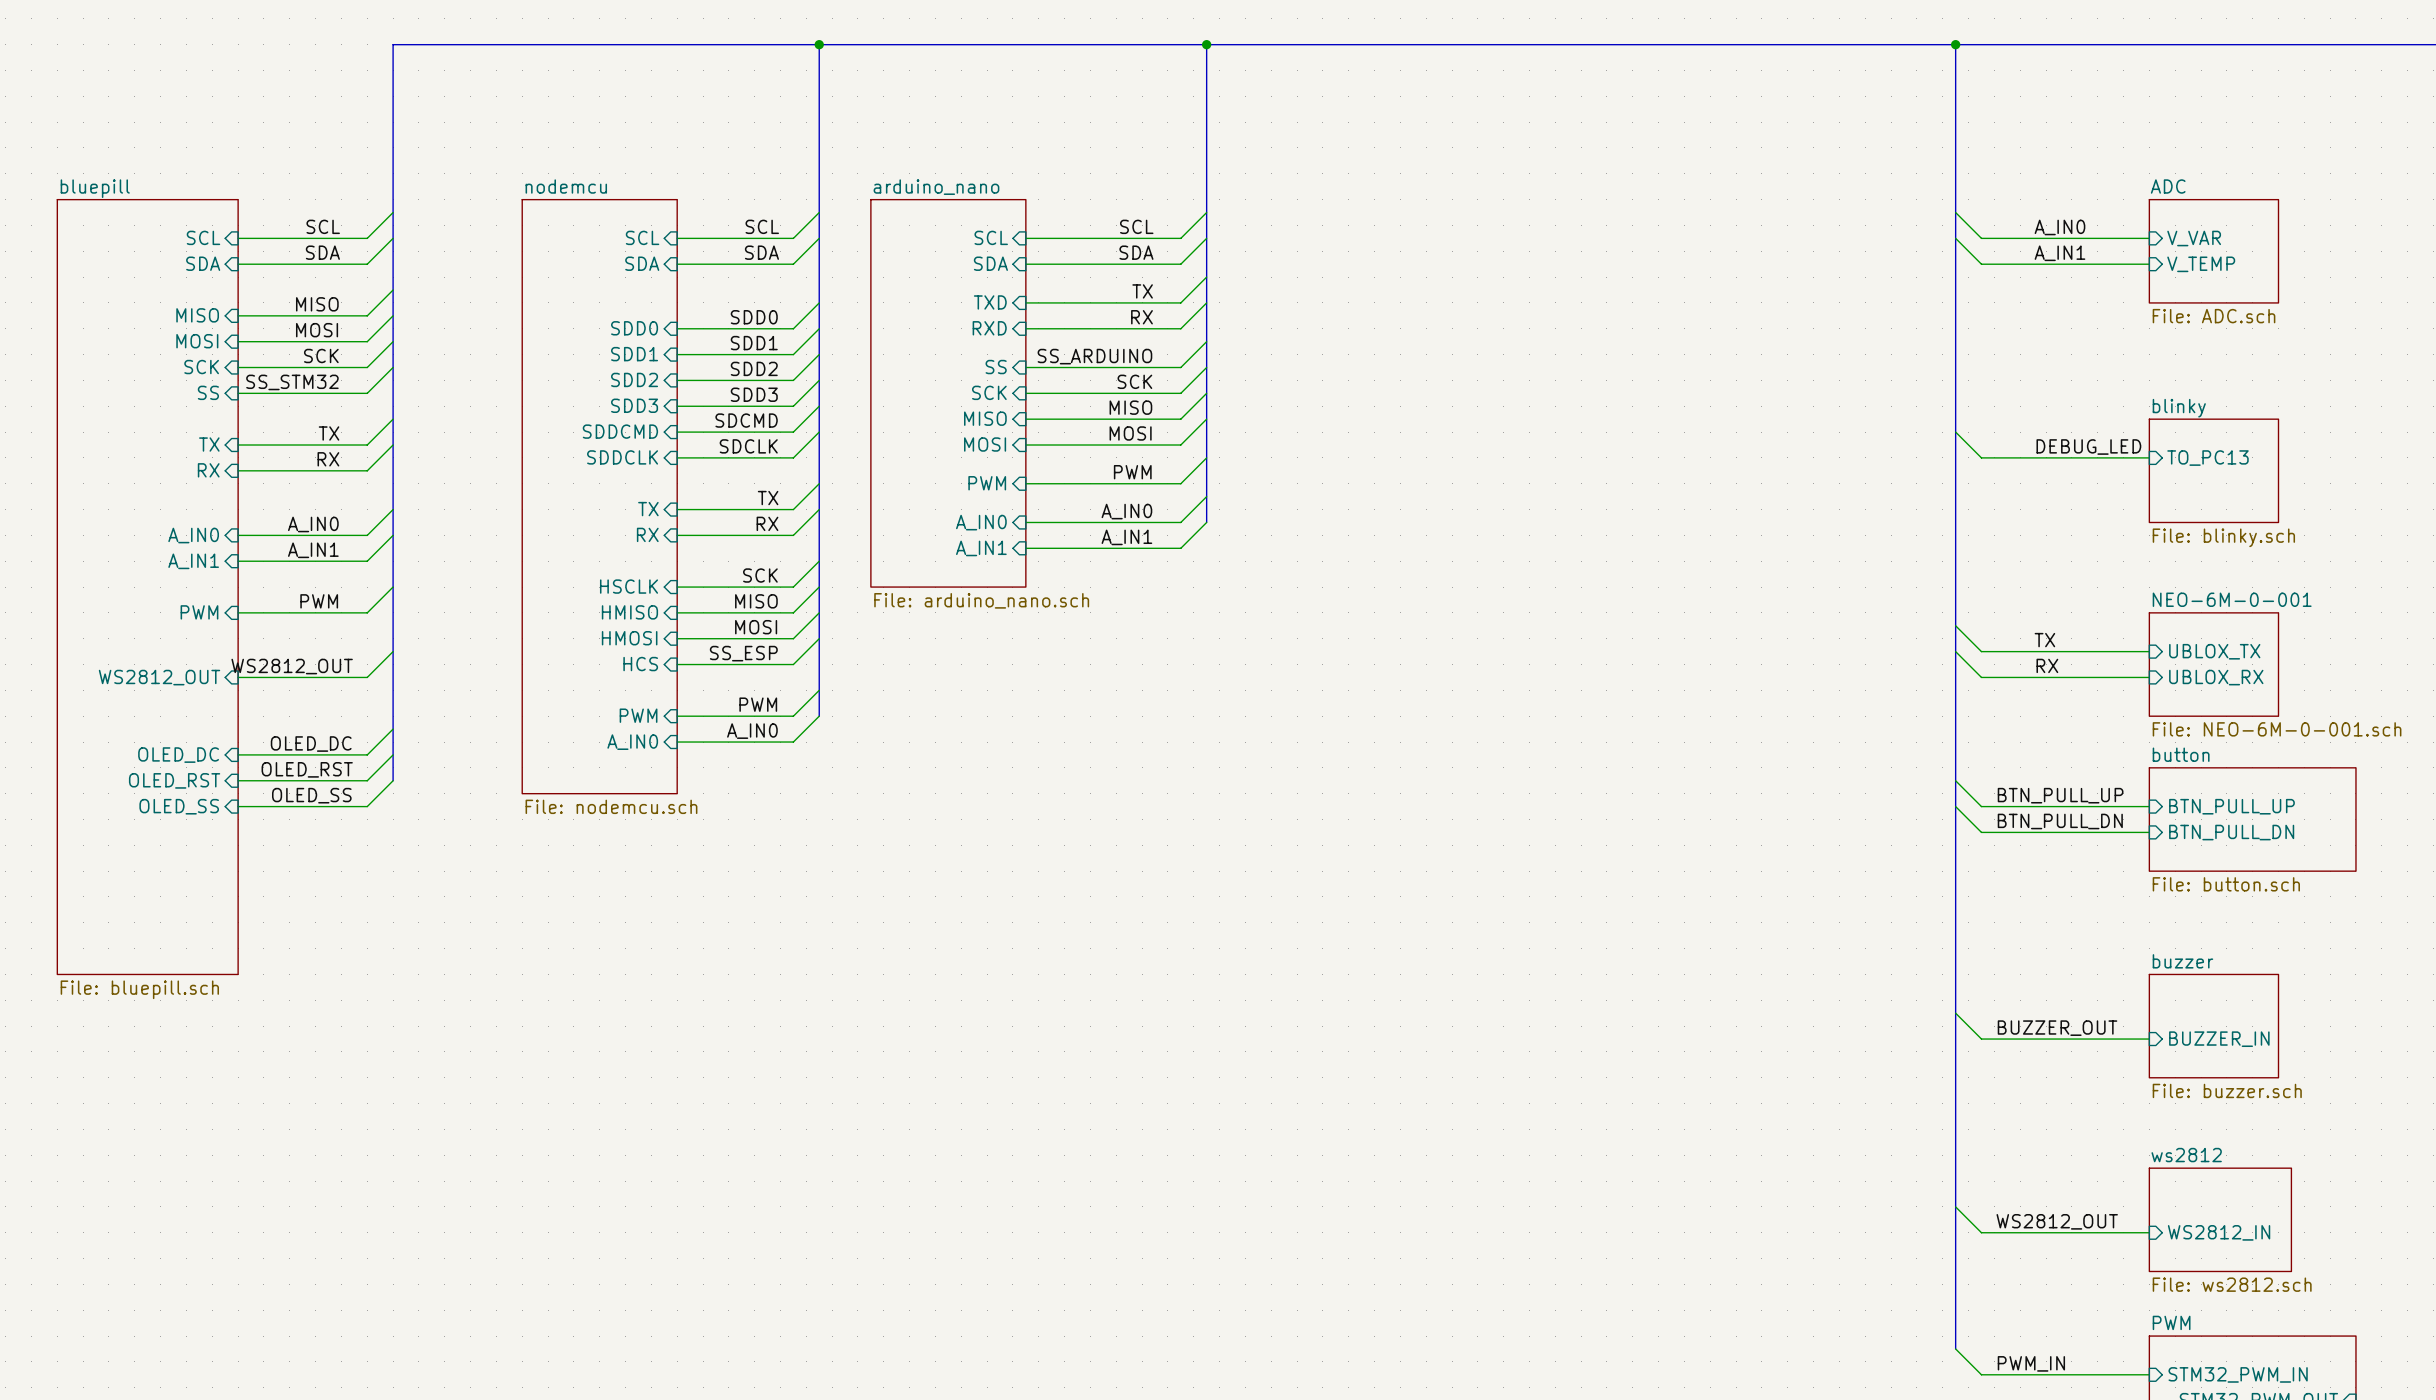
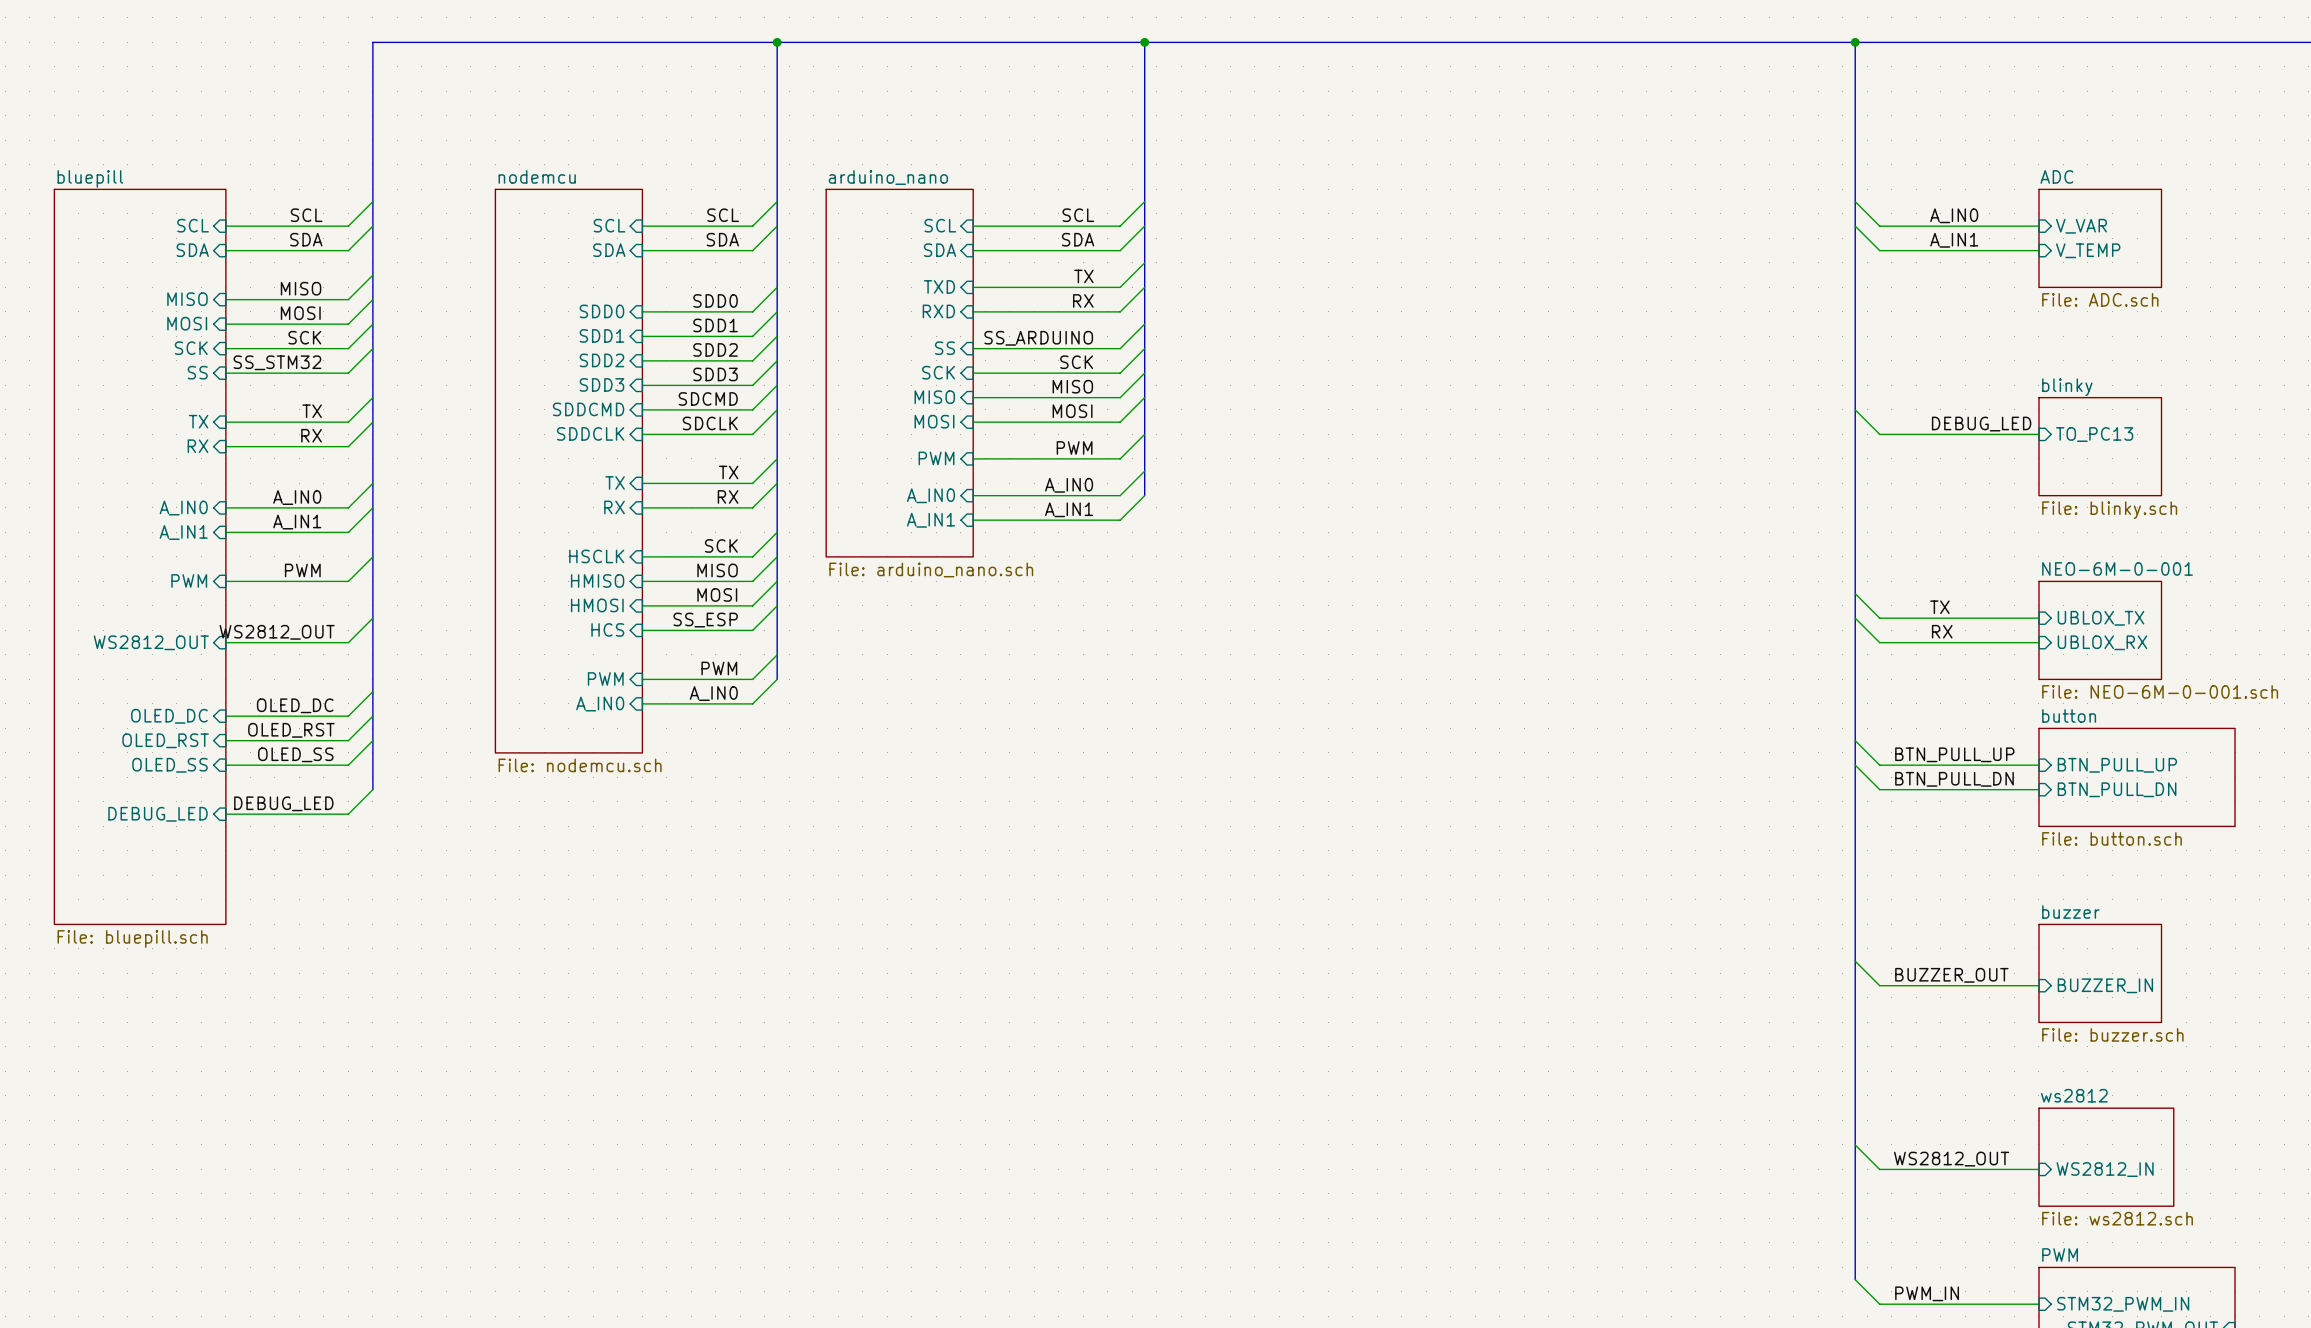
bus: none -> (372, 740) (372, 789)
wire: none -> (372, 789) (348, 814) (225, 814)
label: none -> DEBUG_LED (283, 803)
sheet pin: none -> DEBUG_LED (158, 814)

